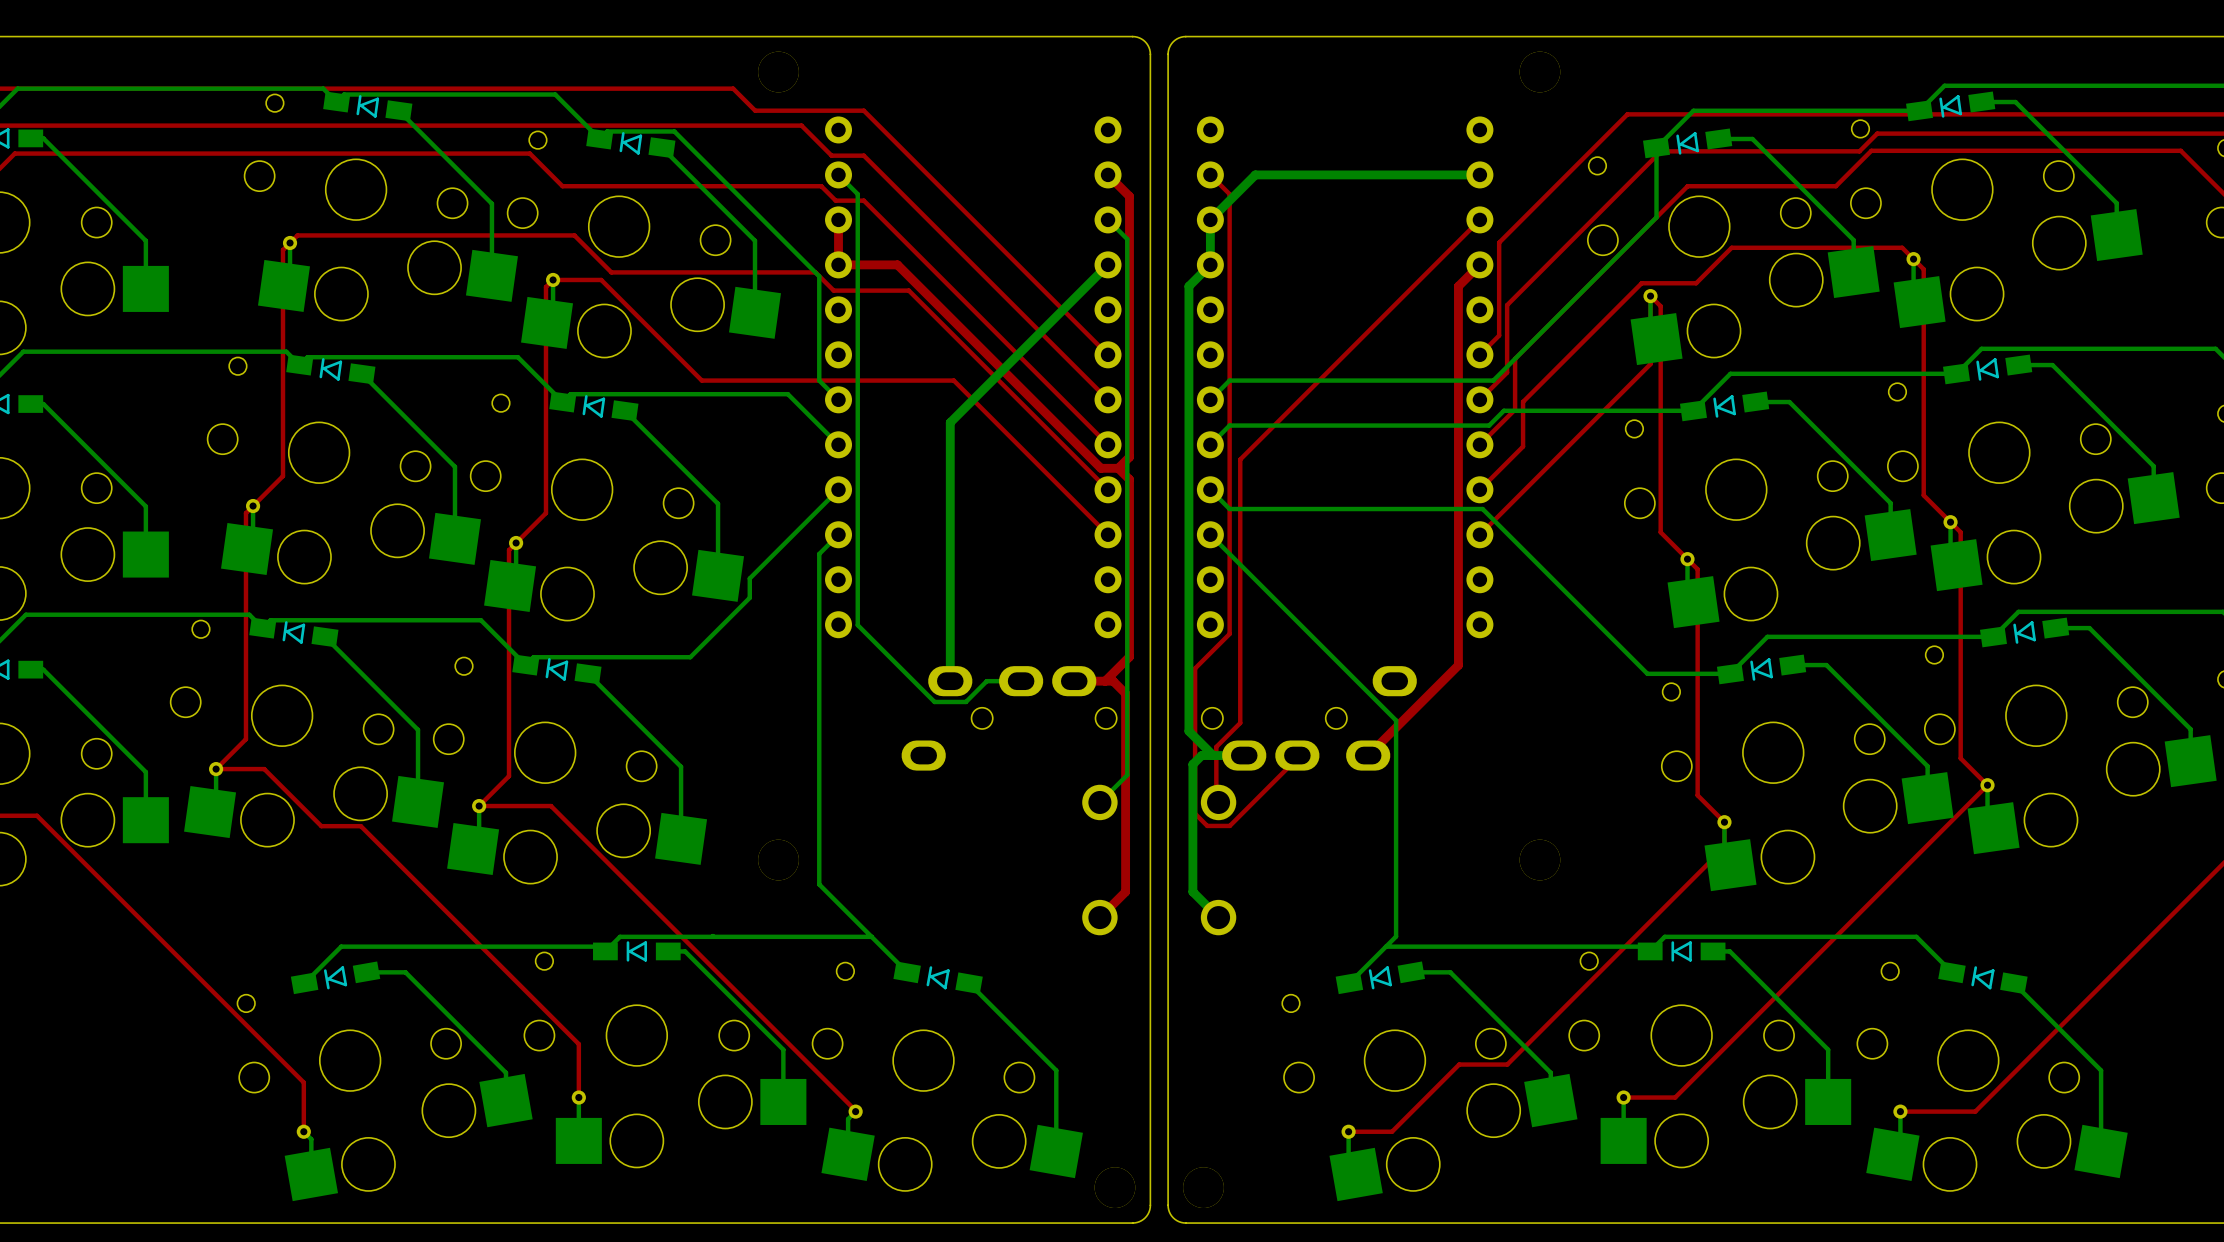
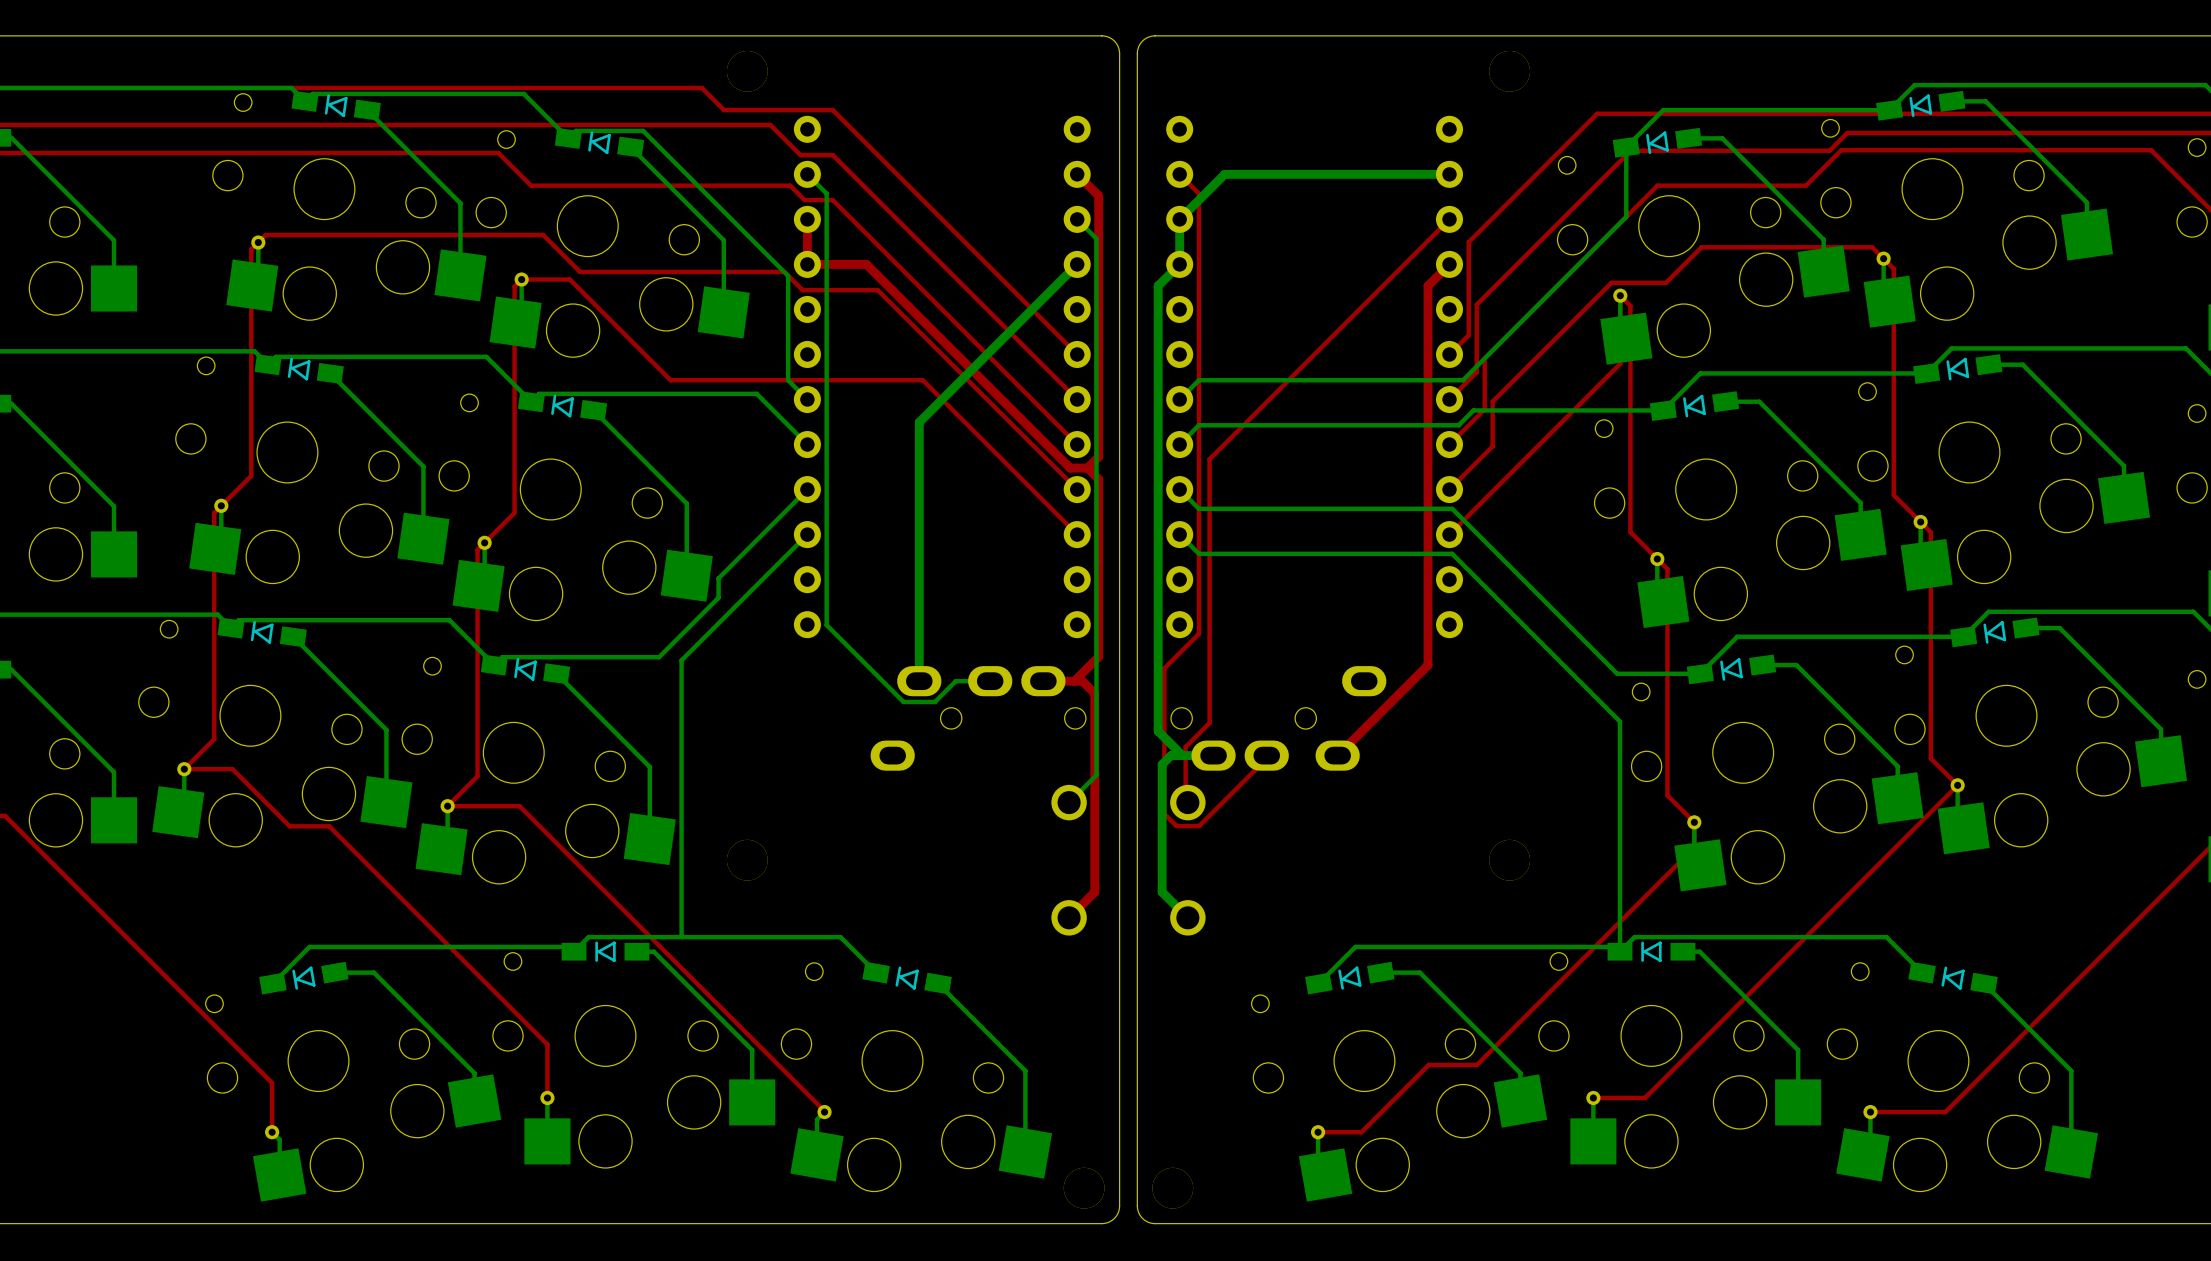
bottom track: (819, 554) (819, 884) (871, 936) -> (788, 553) (681, 660) (681, 936)
bottom track: (1229, 554) (1396, 720) (1396, 936) (1386, 946) -> (1198, 553) (1452, 553) (1619, 721) (1619, 951)

